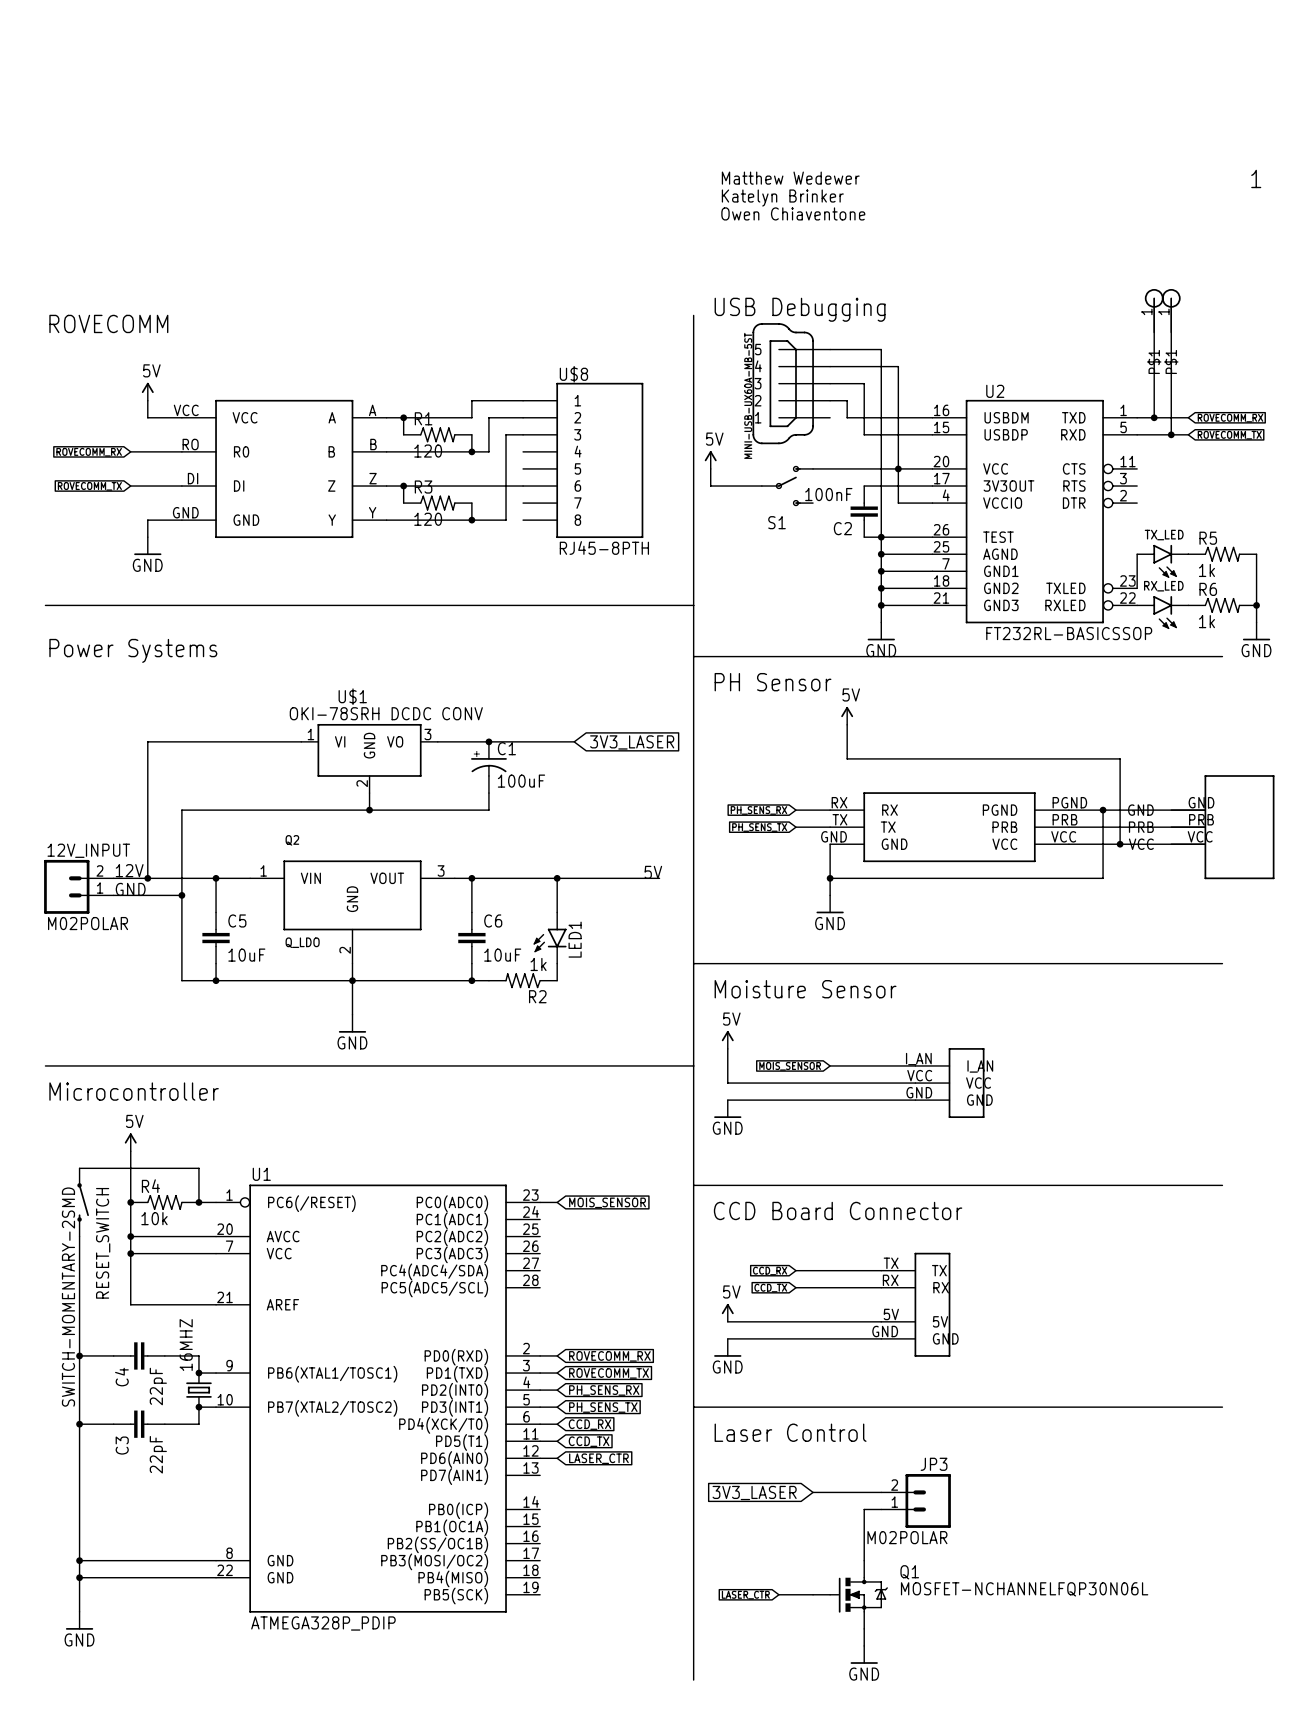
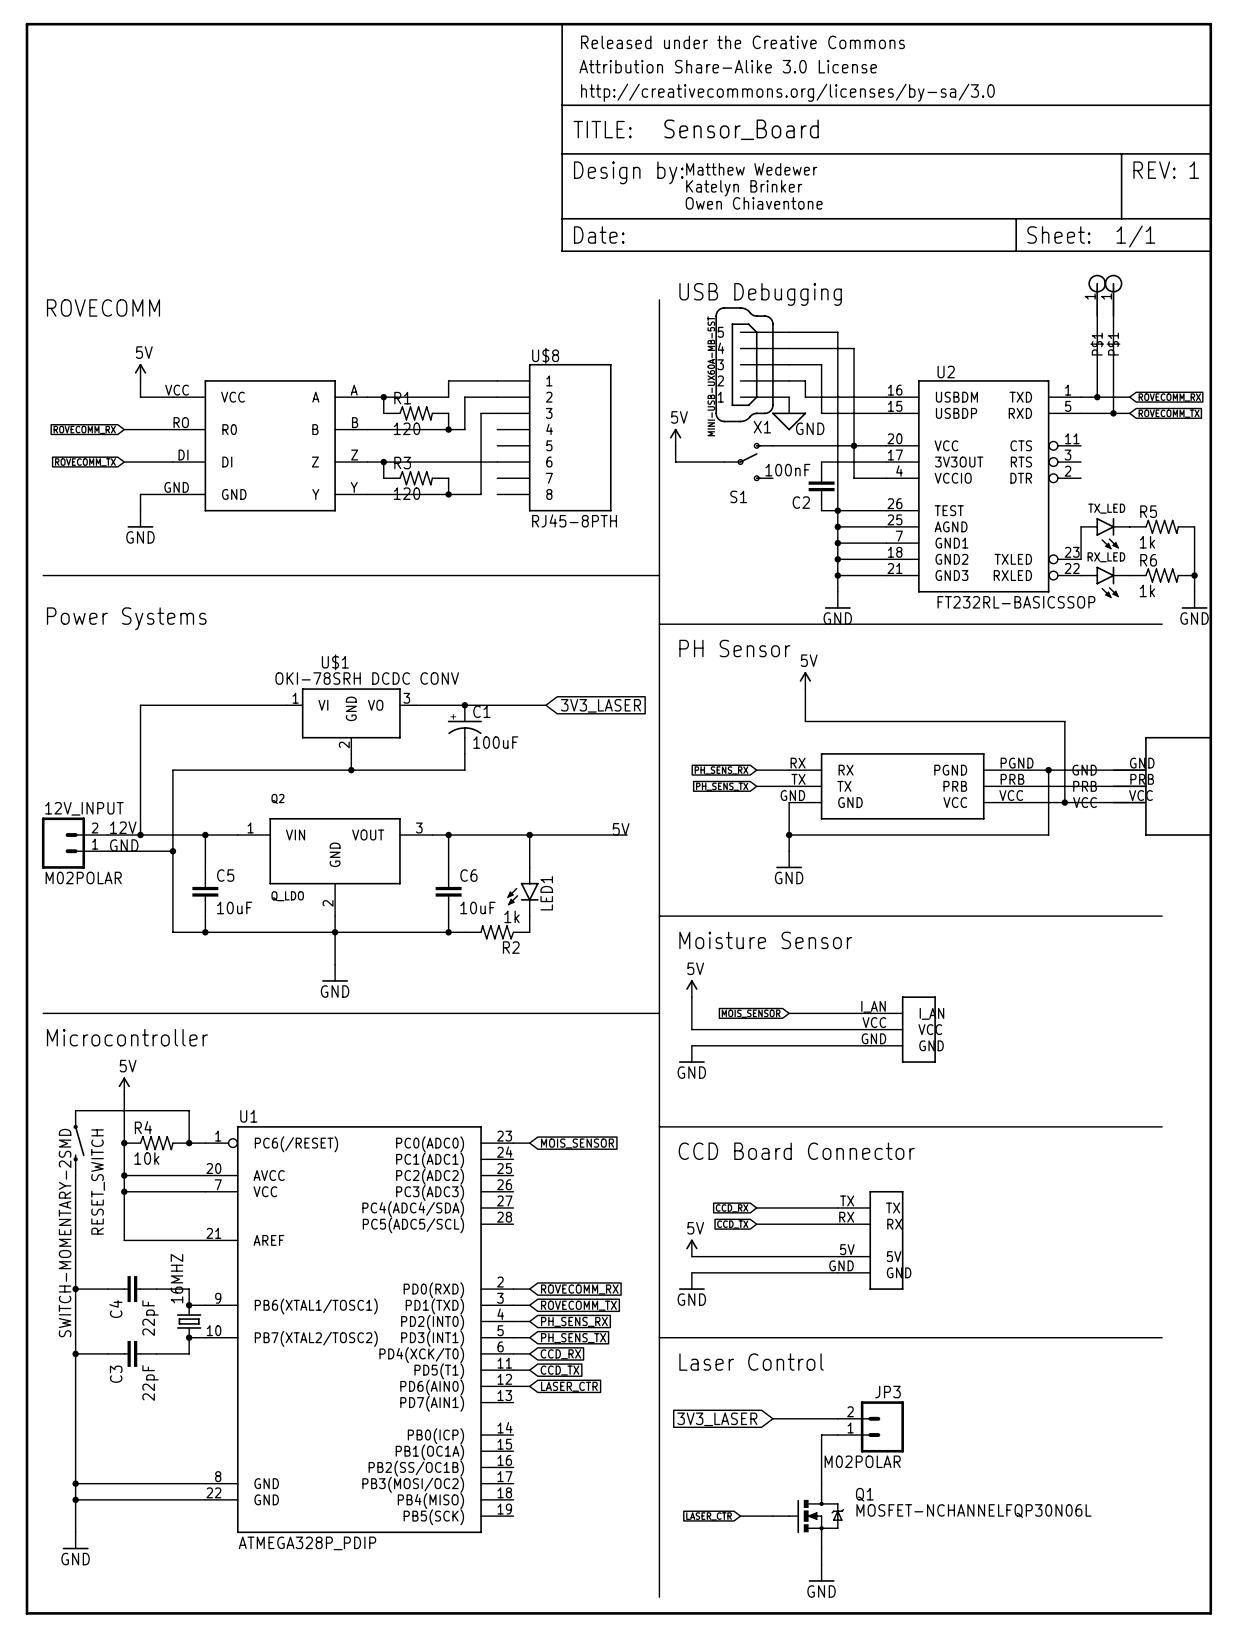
part: none -> (886, 137)
wire: none -> (789, 397) (789, 413)
part: none -> (789, 421)
X1 name: none -> X1 (762, 427)
text: none -> GND (810, 428)
part: none -> (618, 818)

